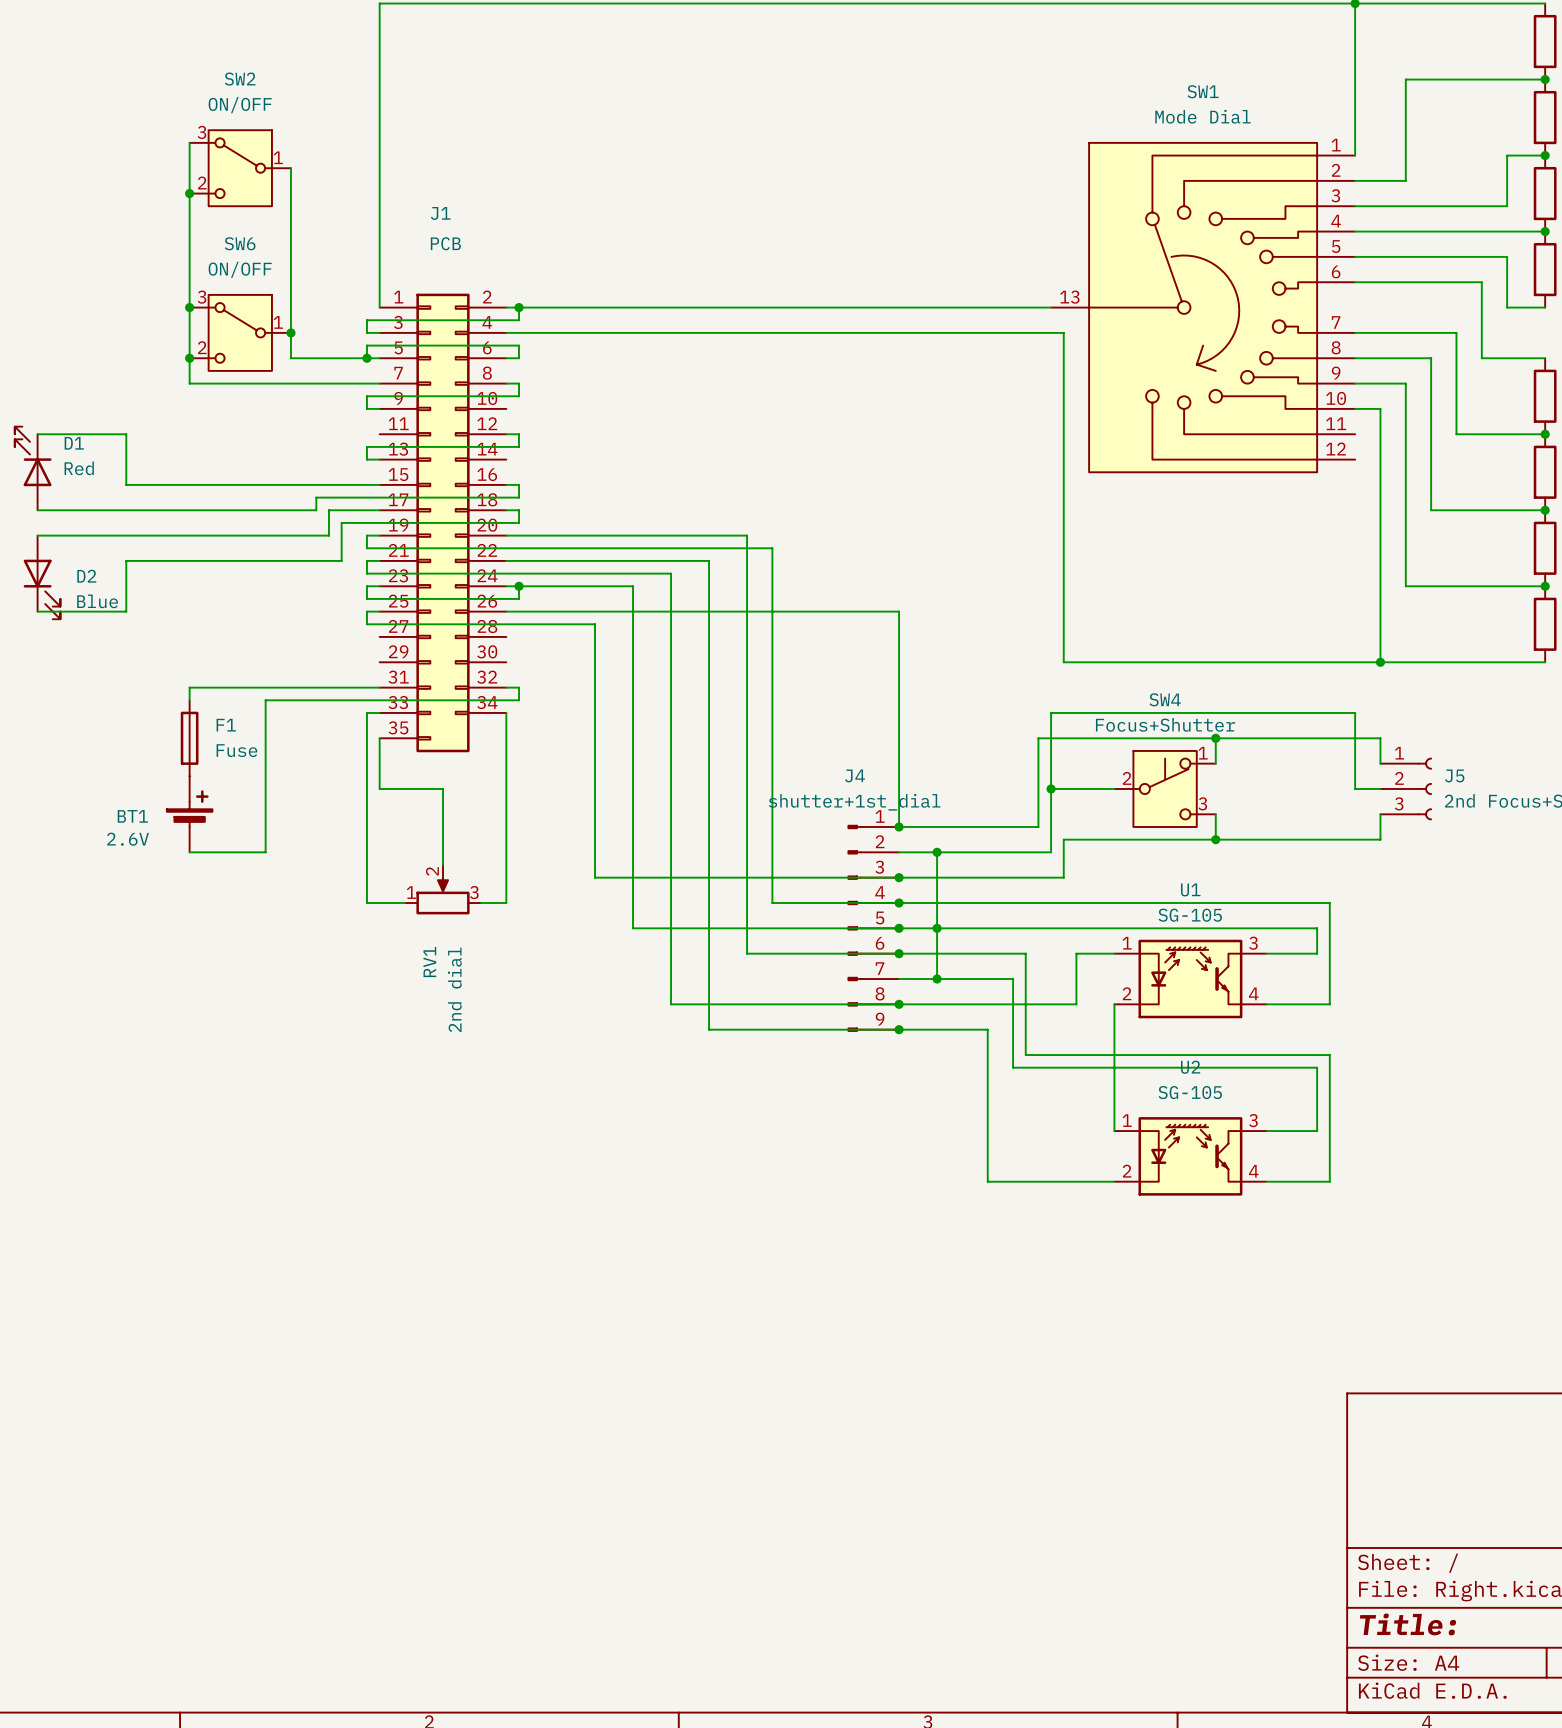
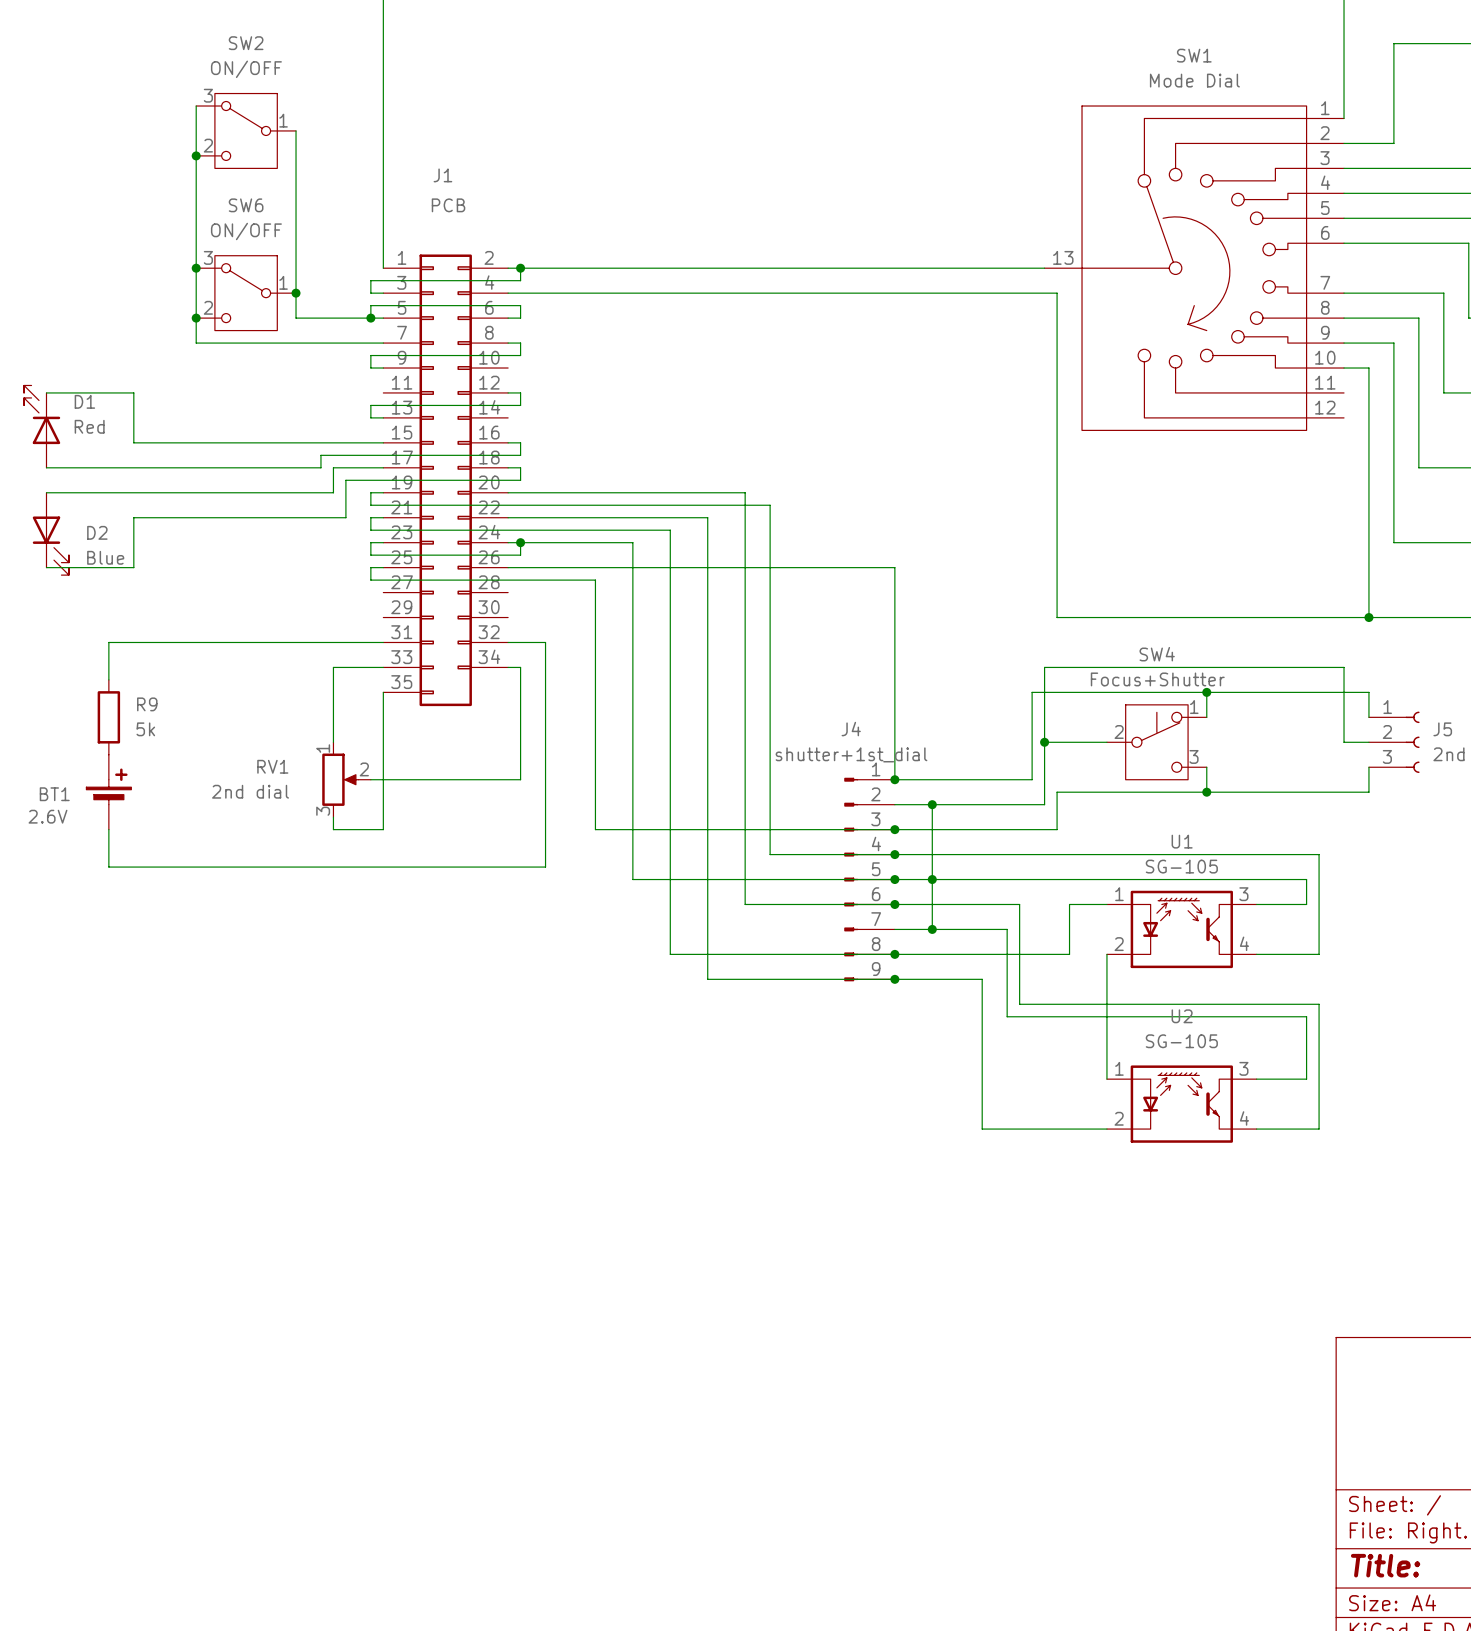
wire: (189, 687) (189, 700) -> (196, 642) (108, 642) (108, 679)
wire: (519, 687) (519, 700) (265, 700) (265, 852) (189, 852) -> (520, 642) (545, 642) (545, 867) (108, 867) (108, 829)
wire: (366, 712) (366, 903) (404, 903) -> (370, 667) (333, 667) (333, 742)
wire: (506, 712) (506, 903) (481, 903) -> (508, 667) (520, 667) (520, 779) (370, 779)
F1: Fuse (189, 738) -> none
R9: none -> 5k (108, 717)
wire: (379, 788) (442, 788) (442, 864) -> (383, 742) (383, 829) (333, 829) (333, 817)
BT1 position: (189, 814) -> (108, 792)
RV1 position: (442, 889) -> (346, 779)
RV1 rotation: 0° (442, 896) -> 90° clockwise (340, 779)

